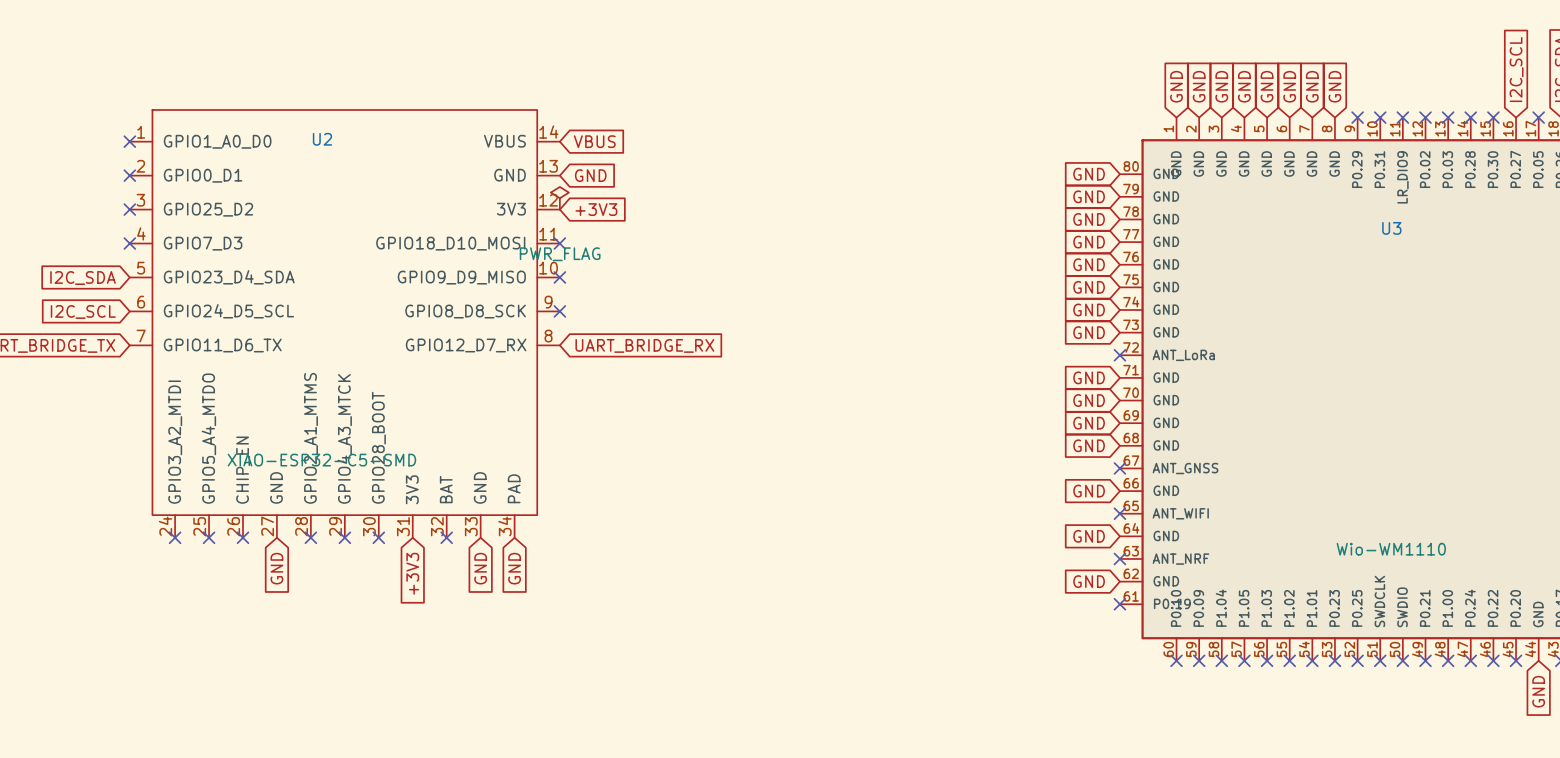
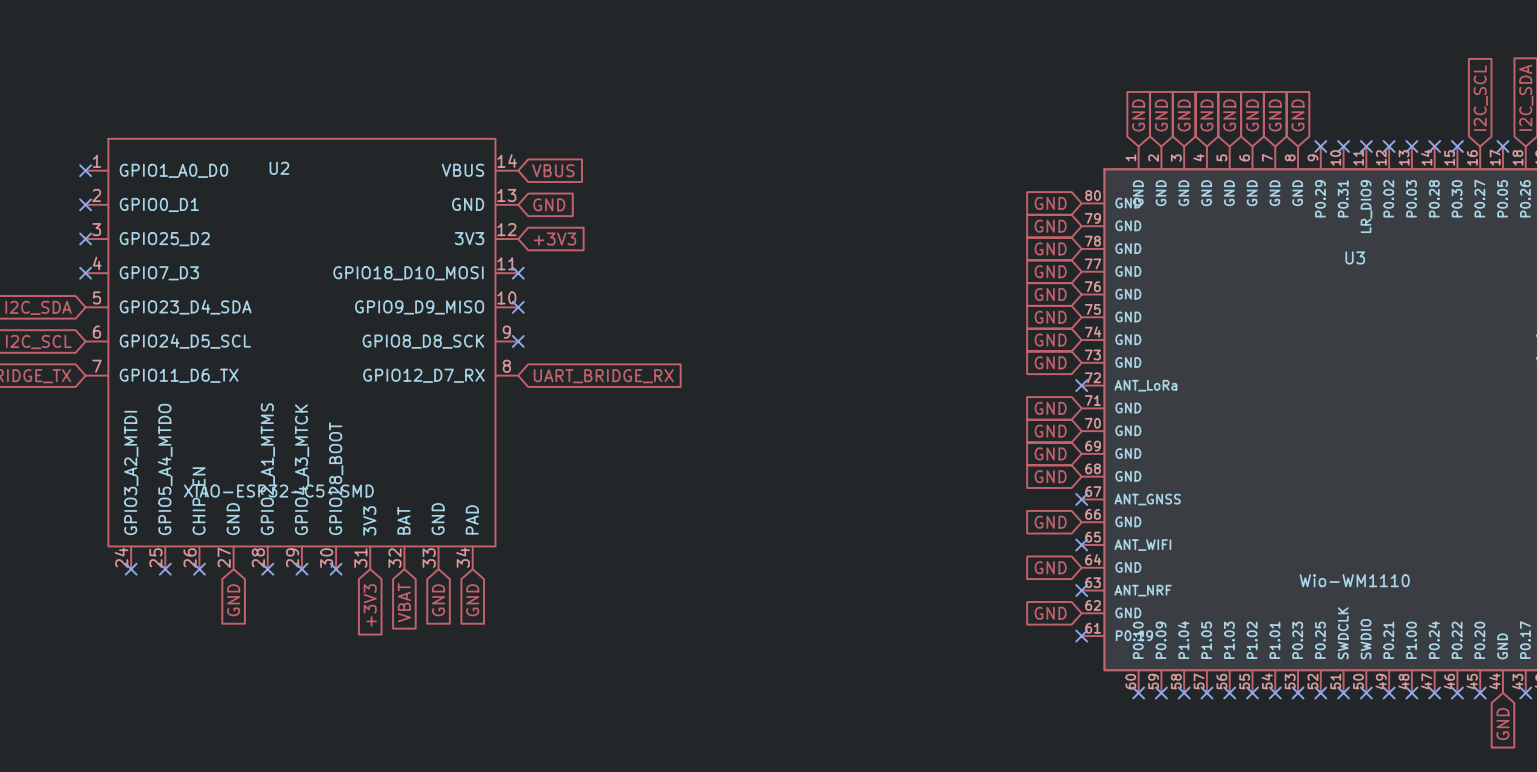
power symbol: PWR_FLAG (559, 198) -> none
no-connect mark: (446, 537) -> none
global label: none -> VBAT (404, 602)

